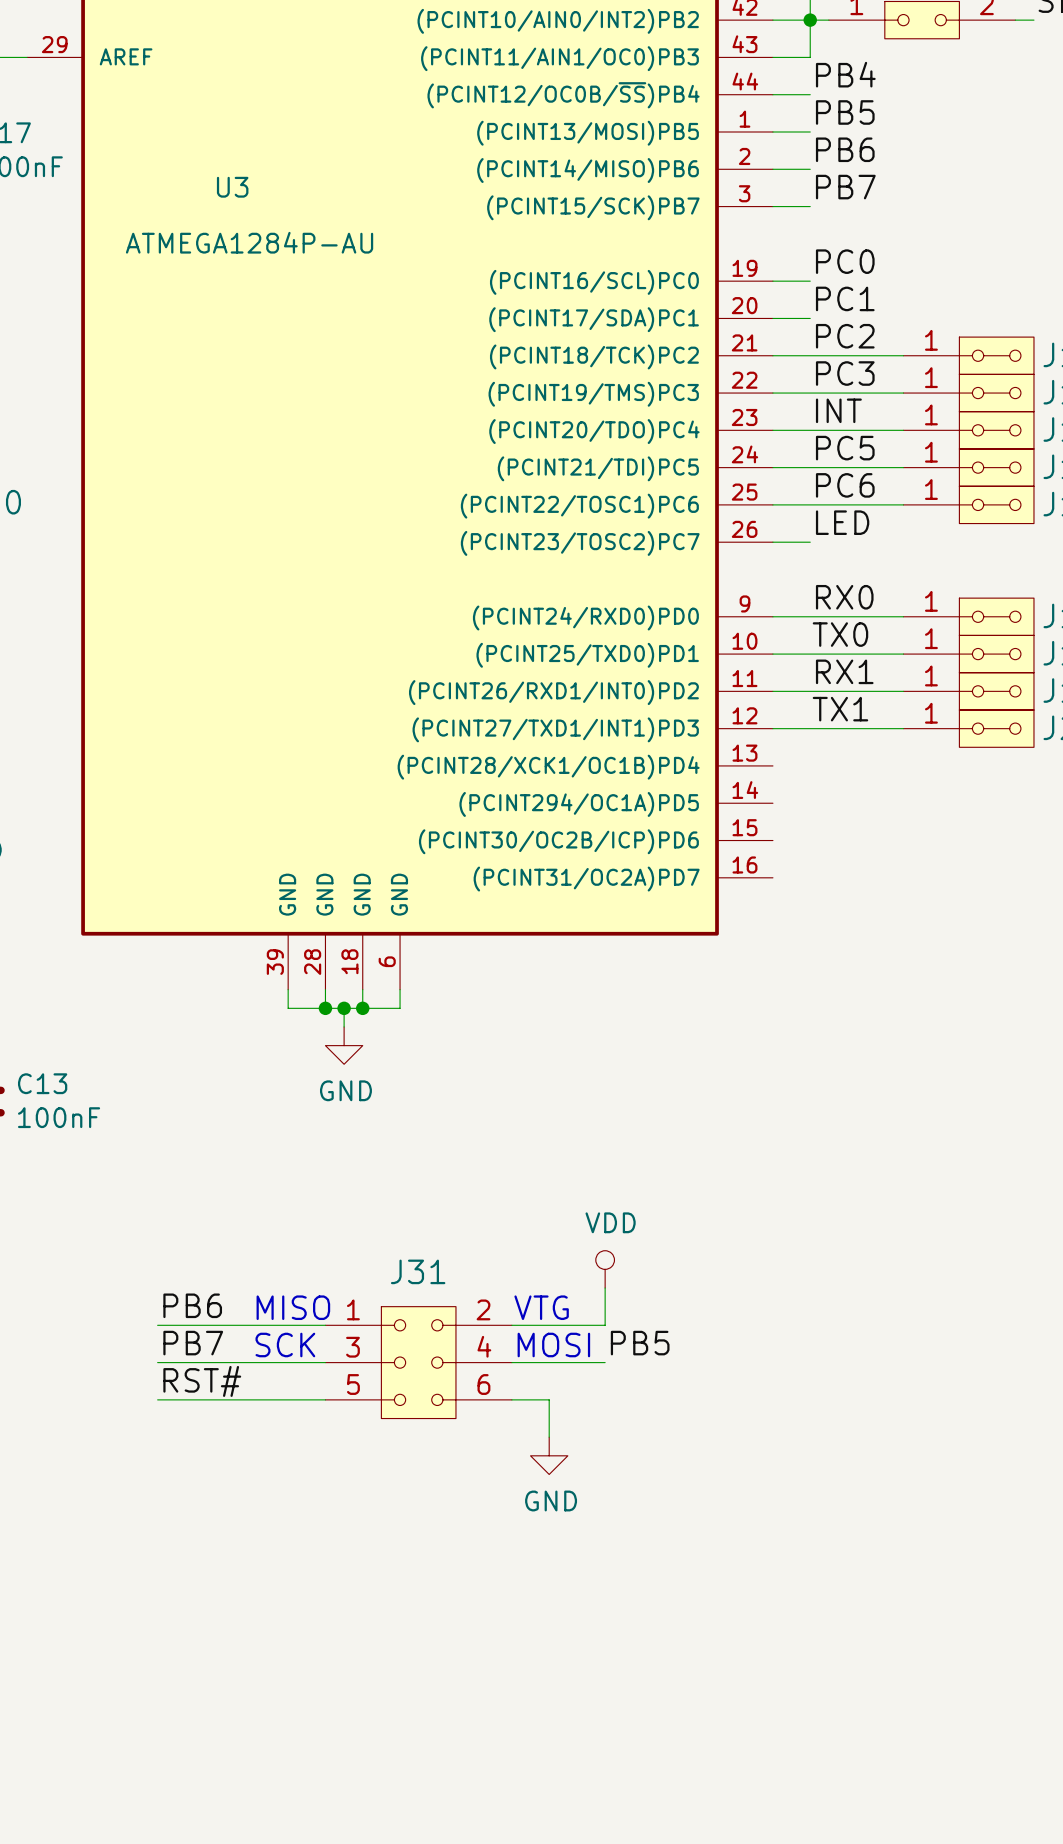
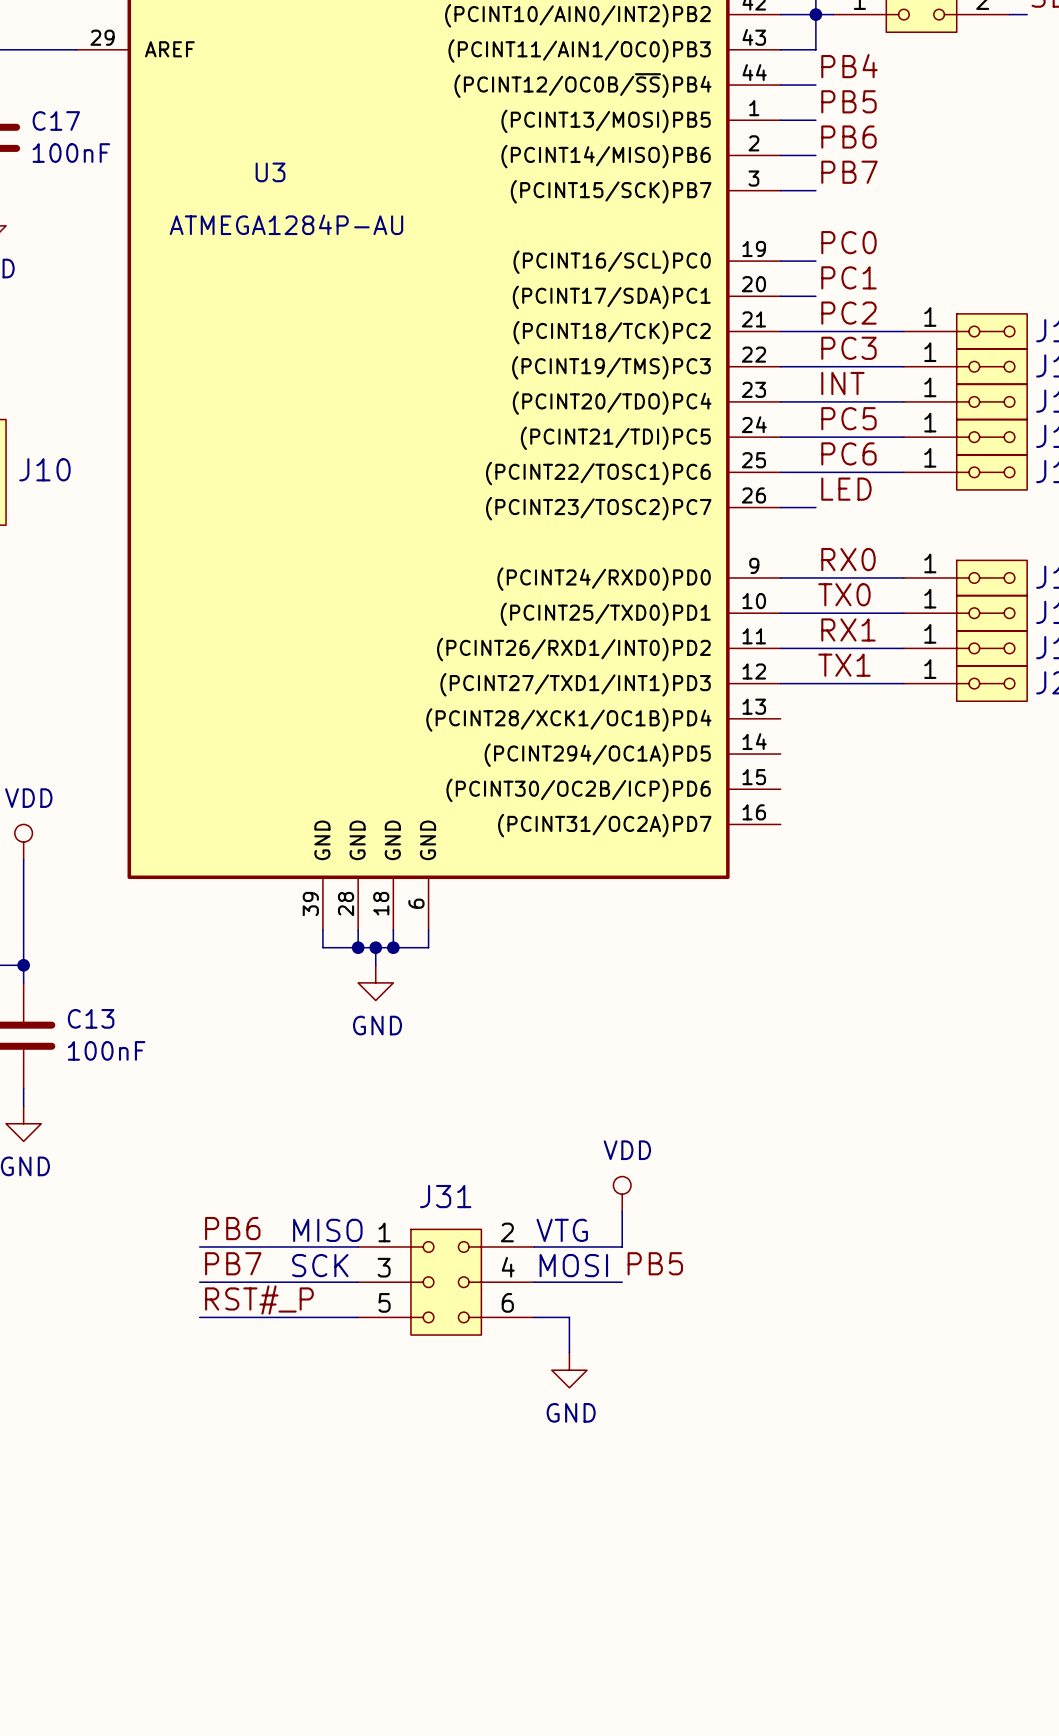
label: RST# (202, 1381) -> RST#_P (259, 1299)

